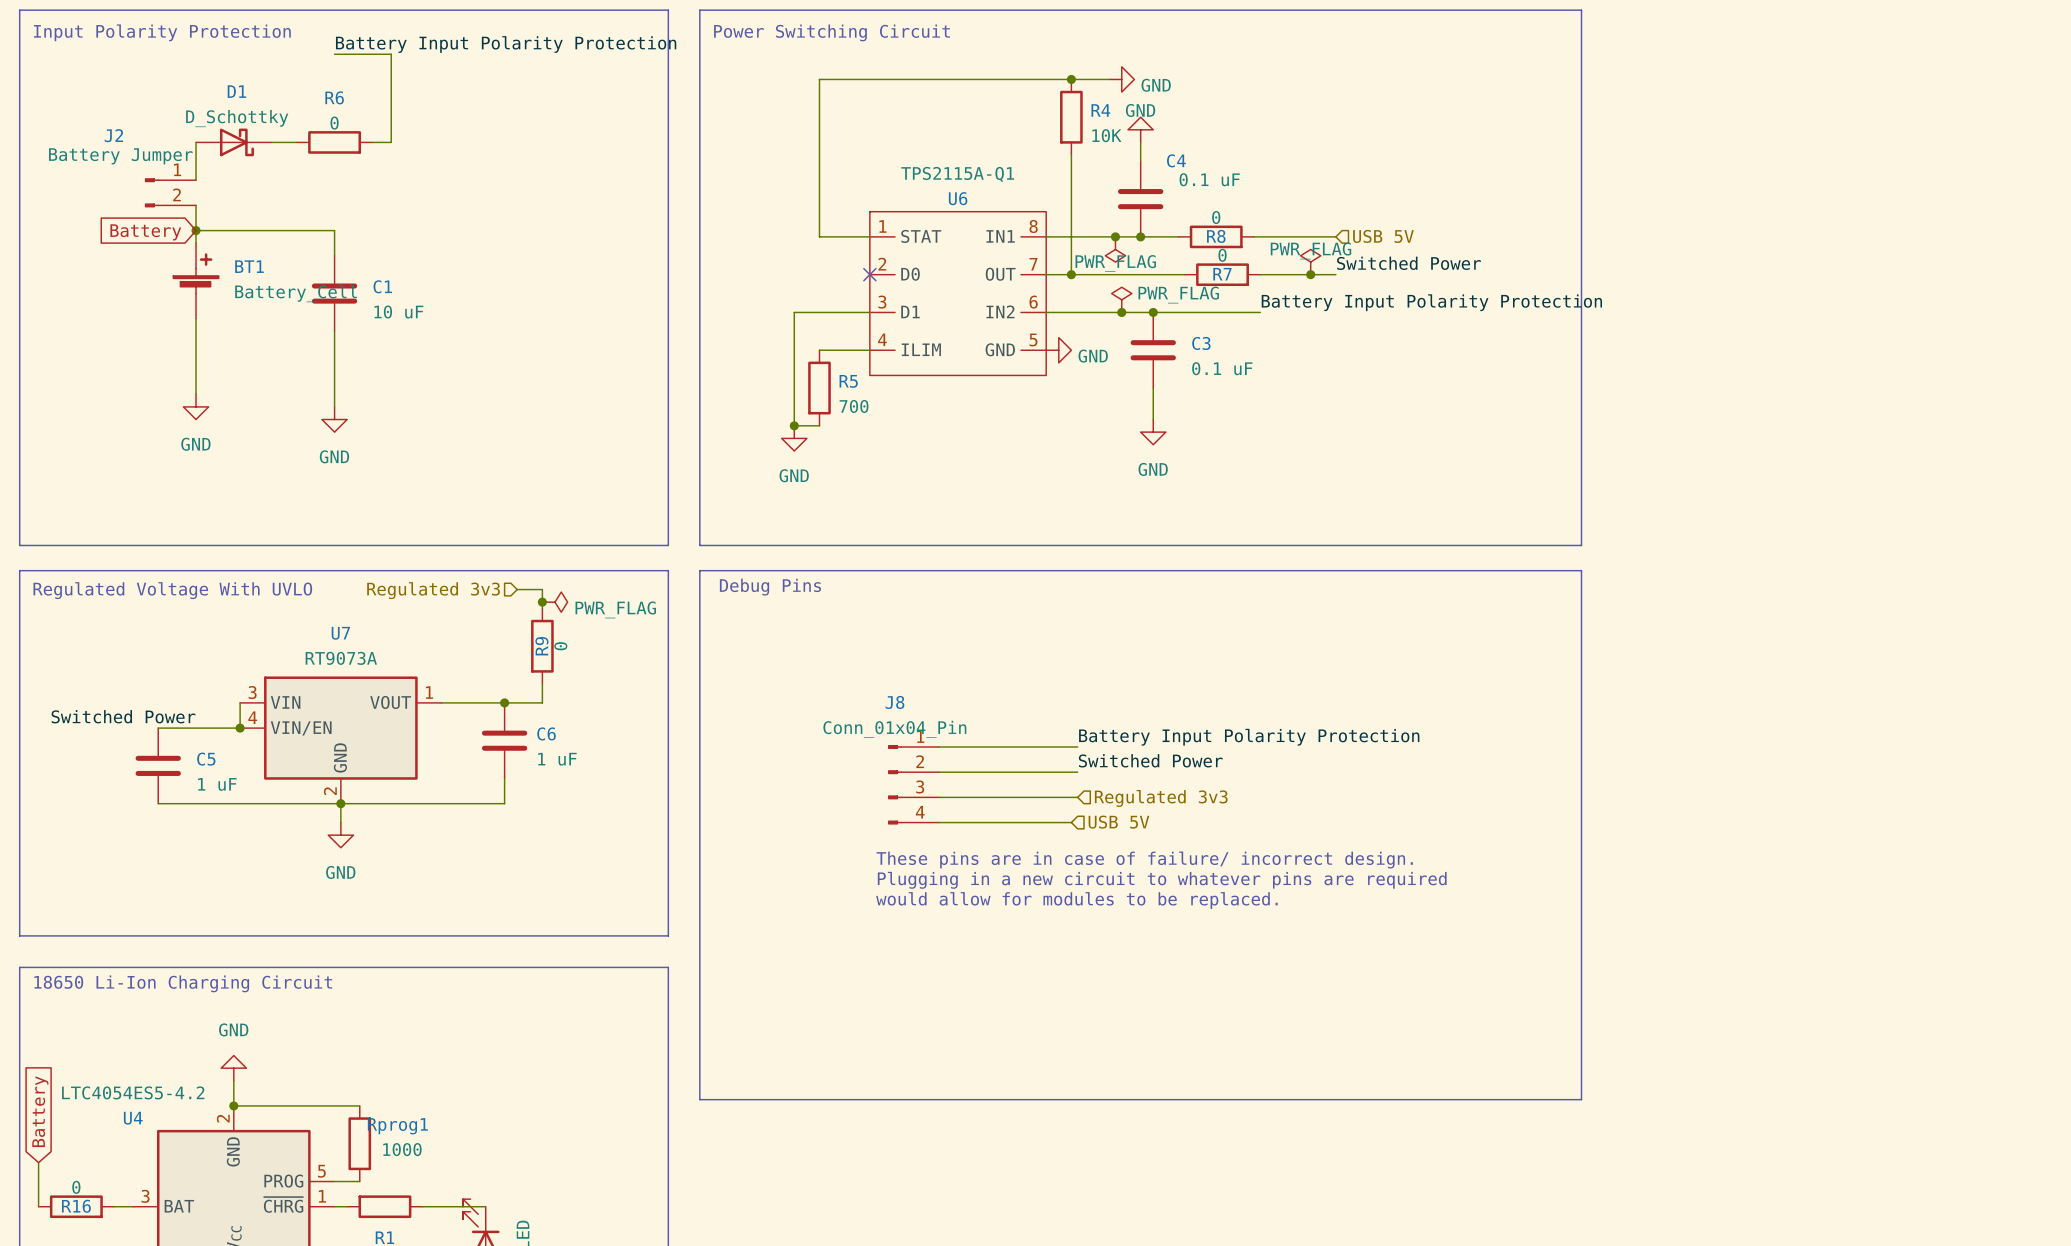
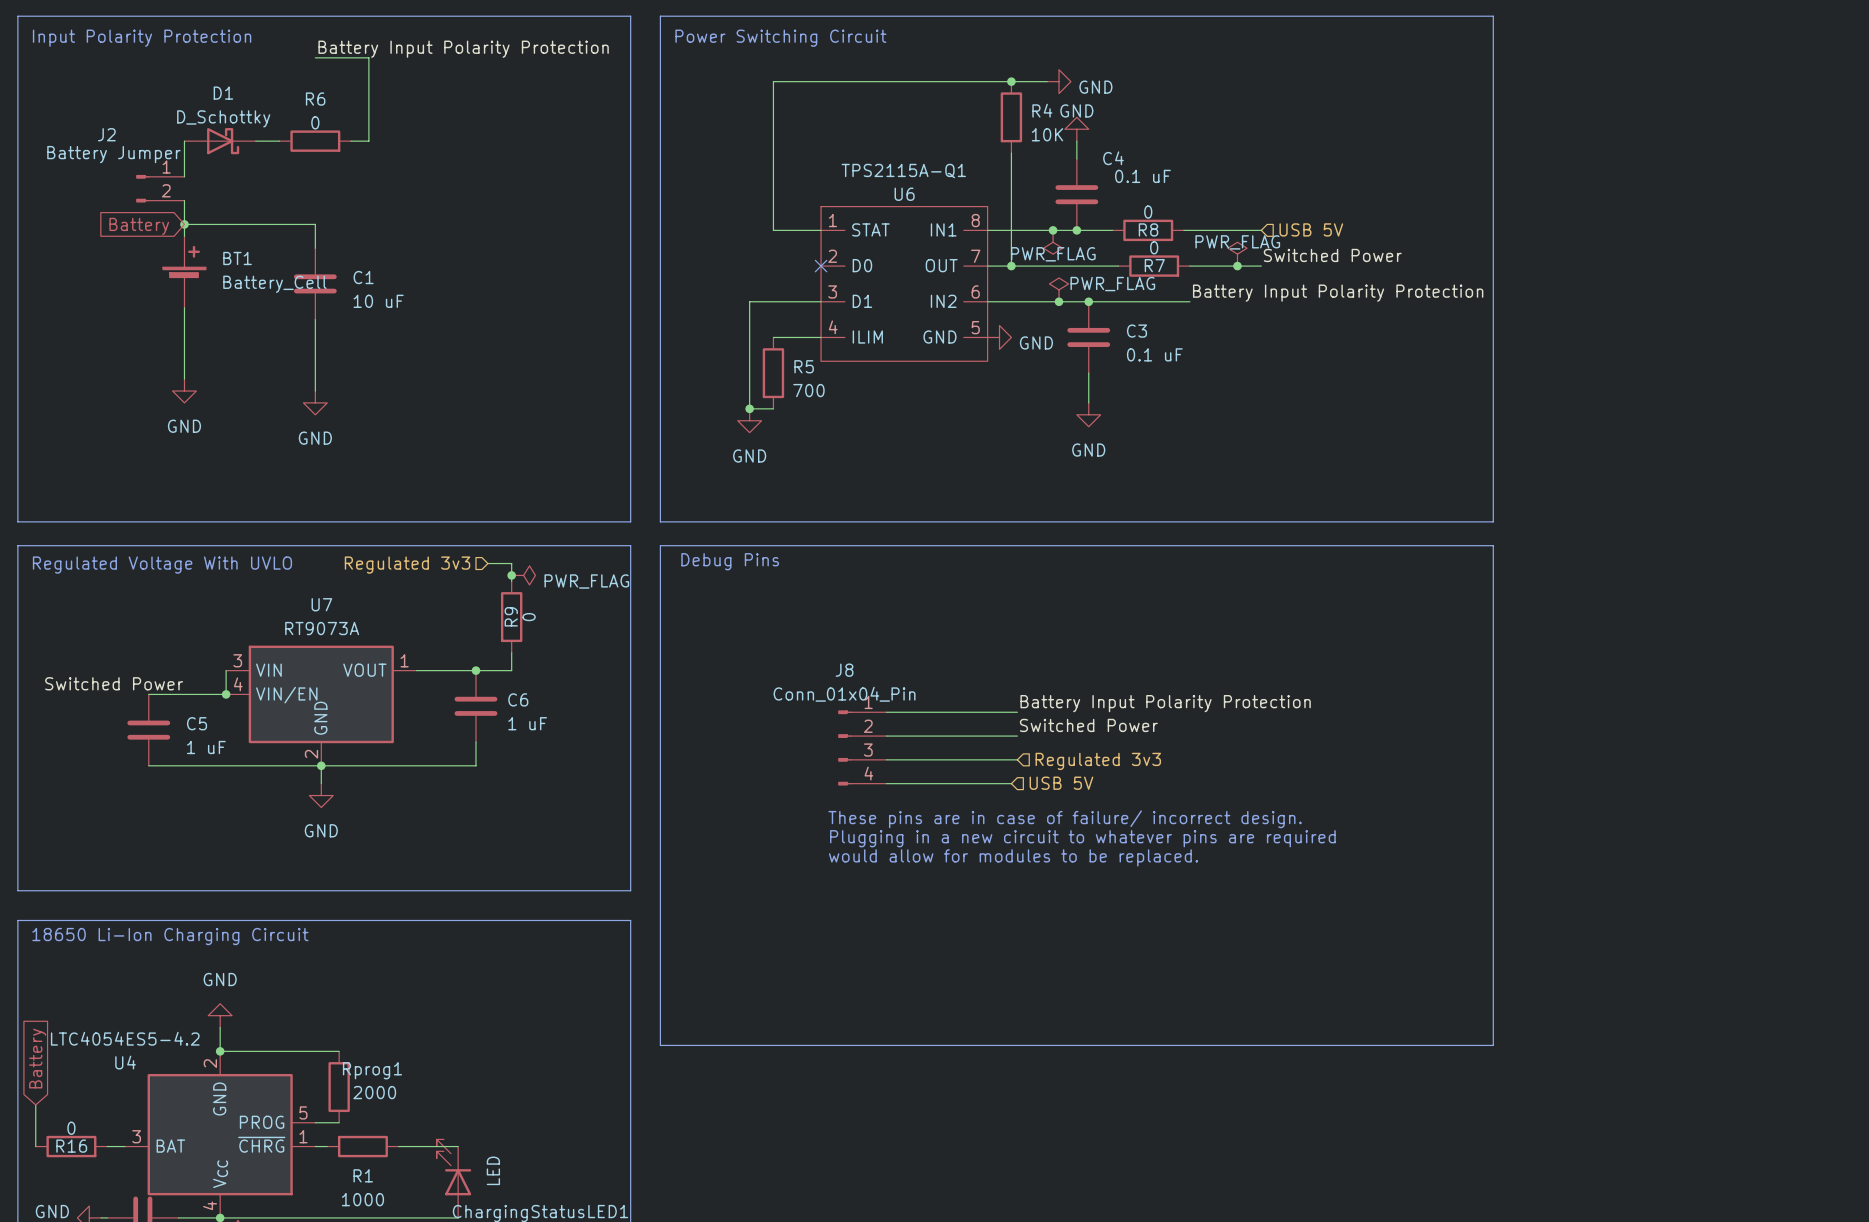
Rprog1 value: 1000 (402, 1149) -> 2000 (374, 1092)

